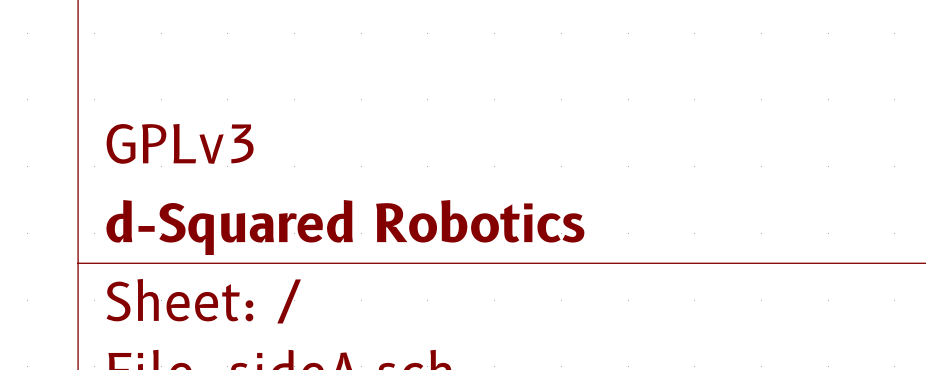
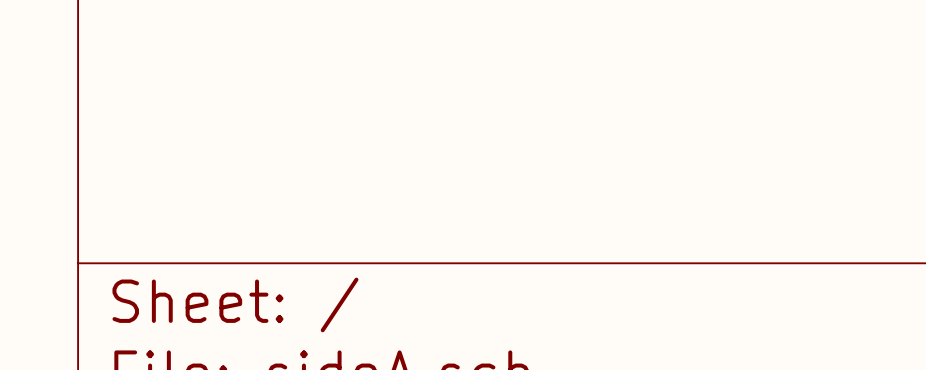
title block: GPLv3 (180, 143) -> none
title block: d-Squared Robotics (345, 227) -> none

